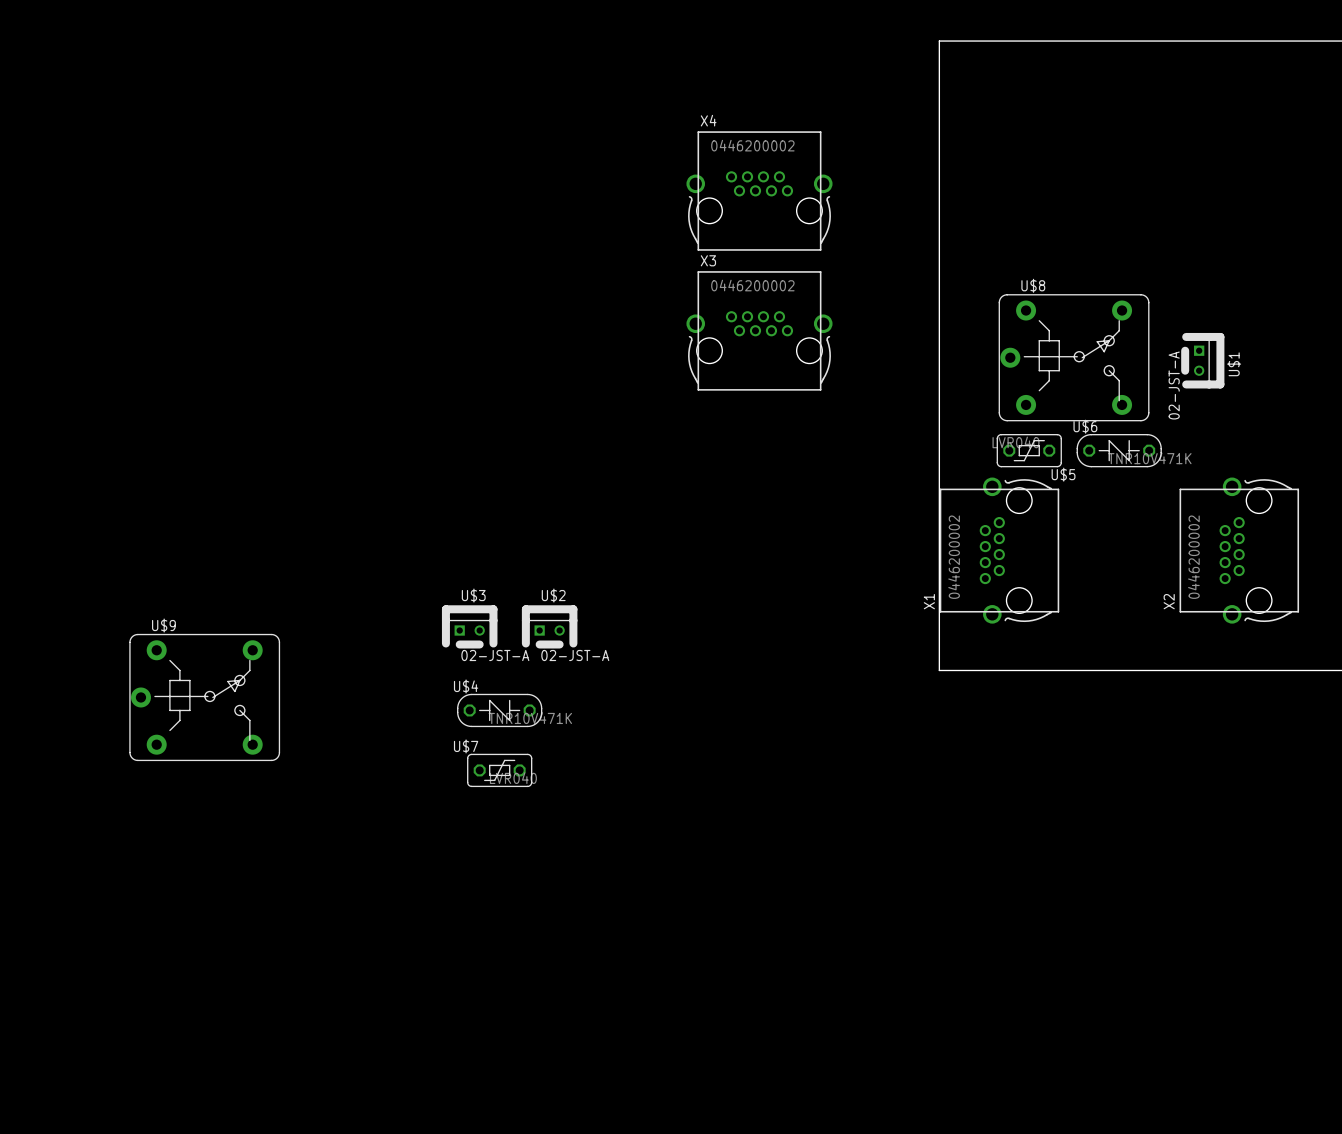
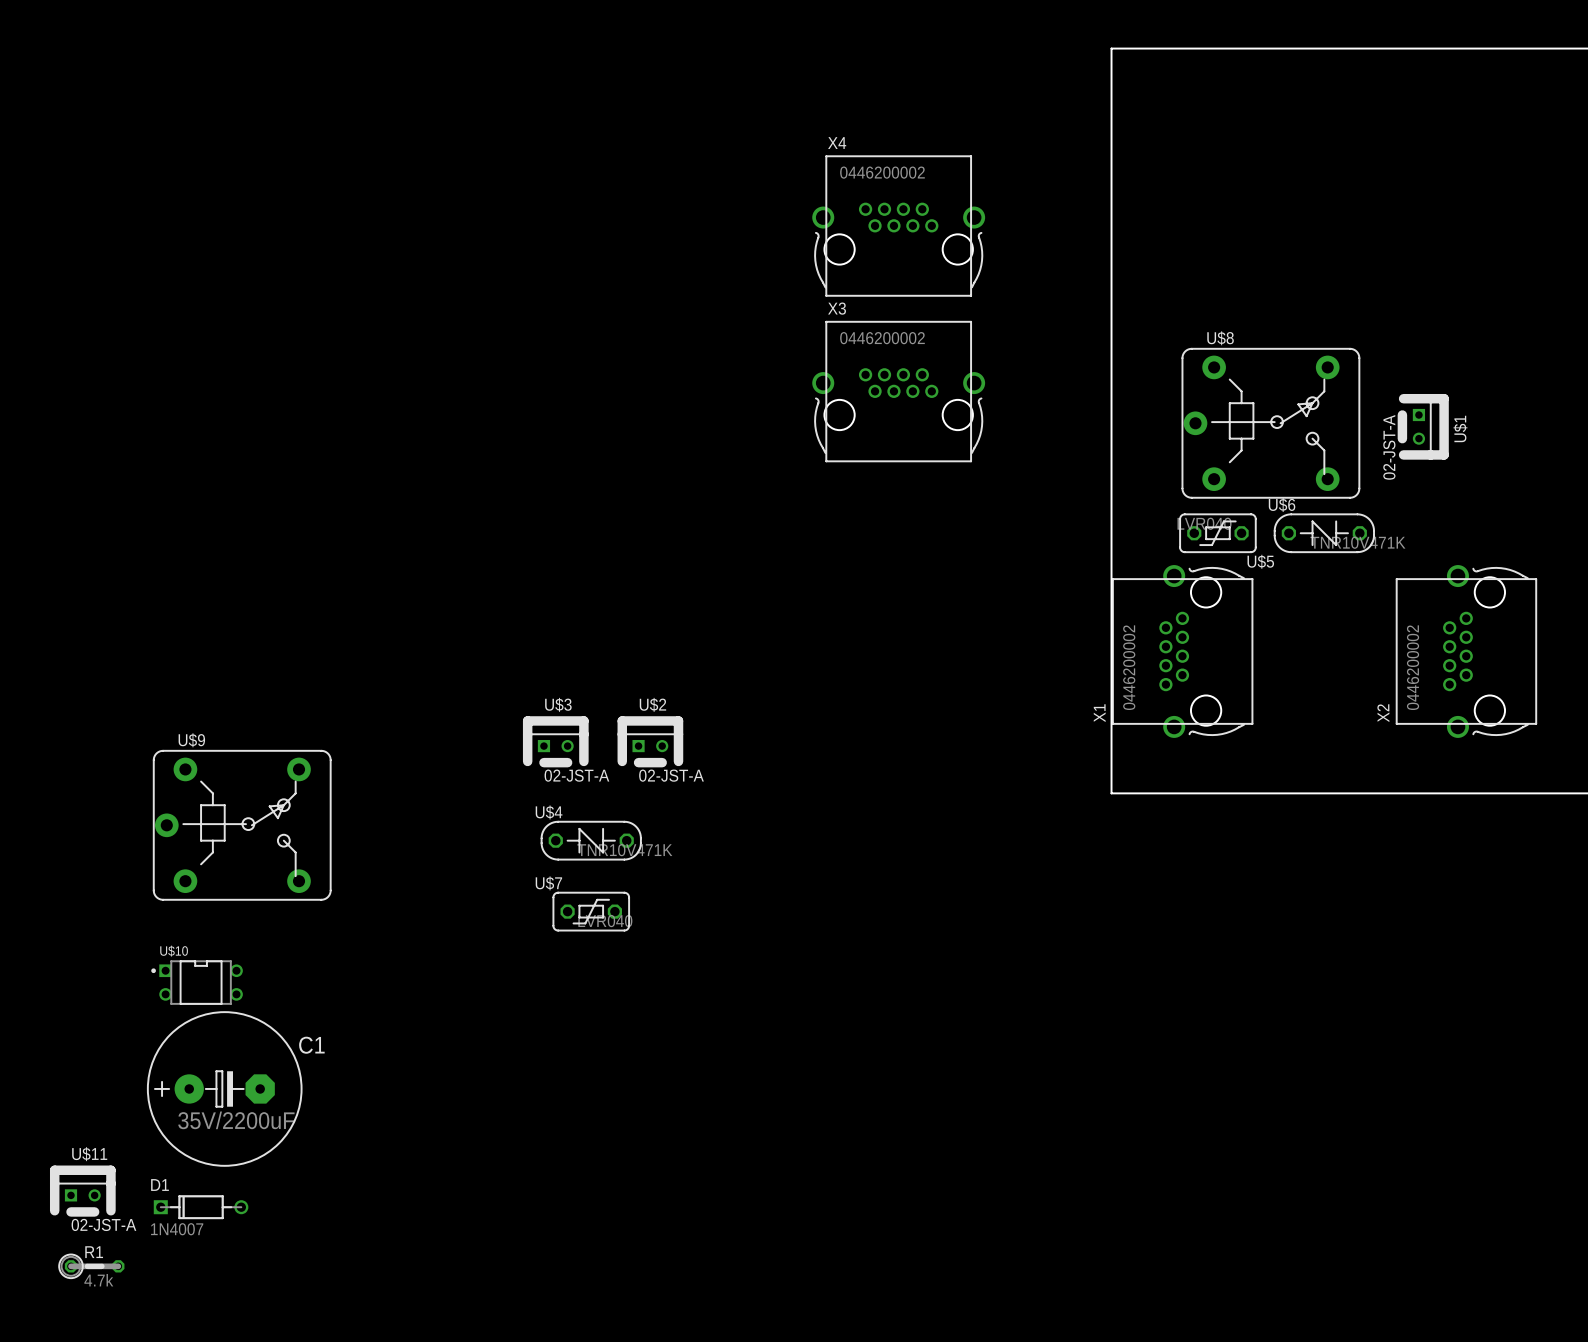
U$10: none -> (197, 982)
C1: none -> 35V/2200uF (224, 1088)
U$11: none -> 02-JST-A (82, 1191)
D1: none -> 1N4007 (201, 1207)
R1: none -> 4.7k (91, 1266)

